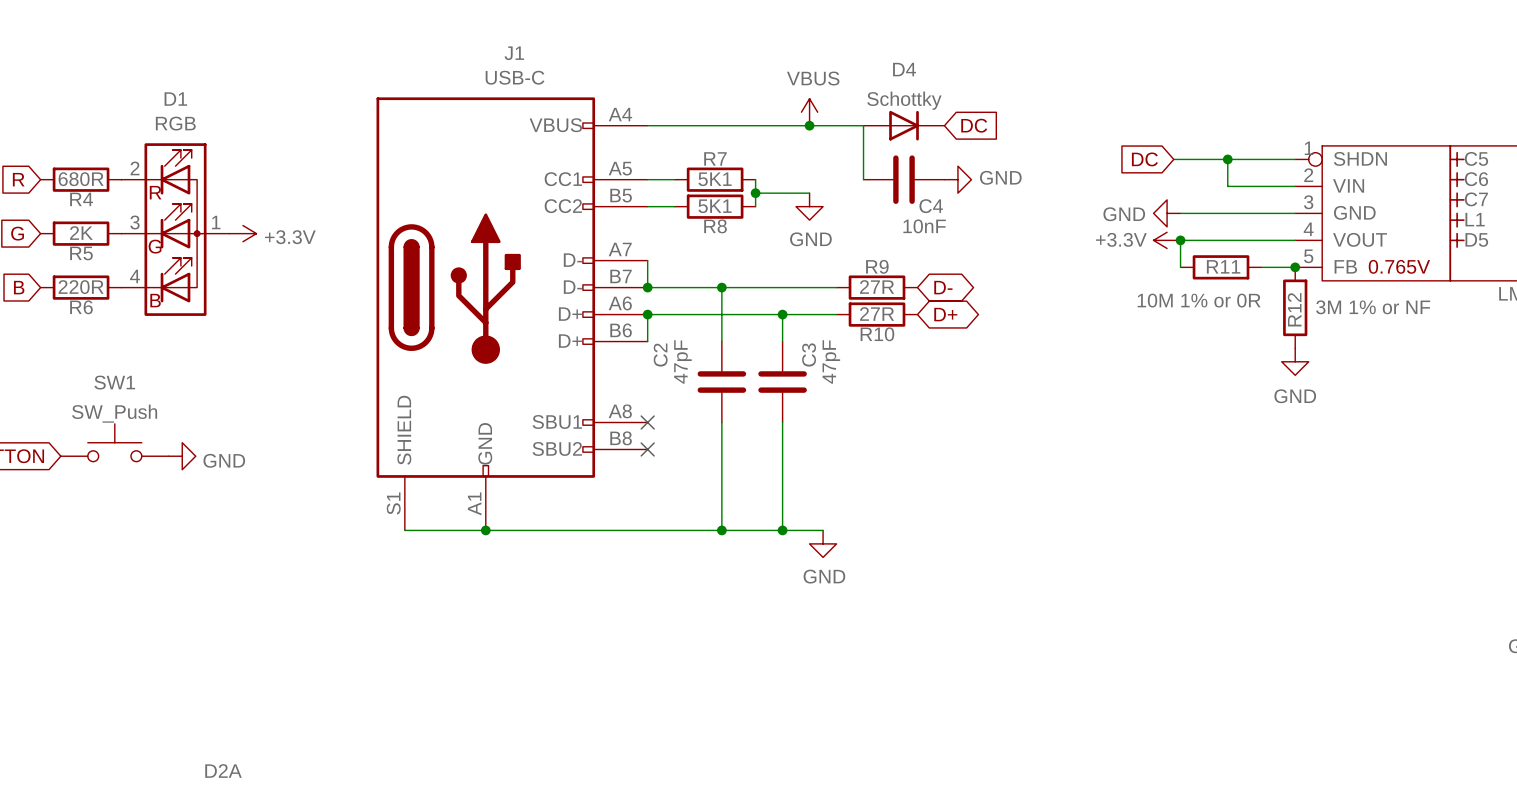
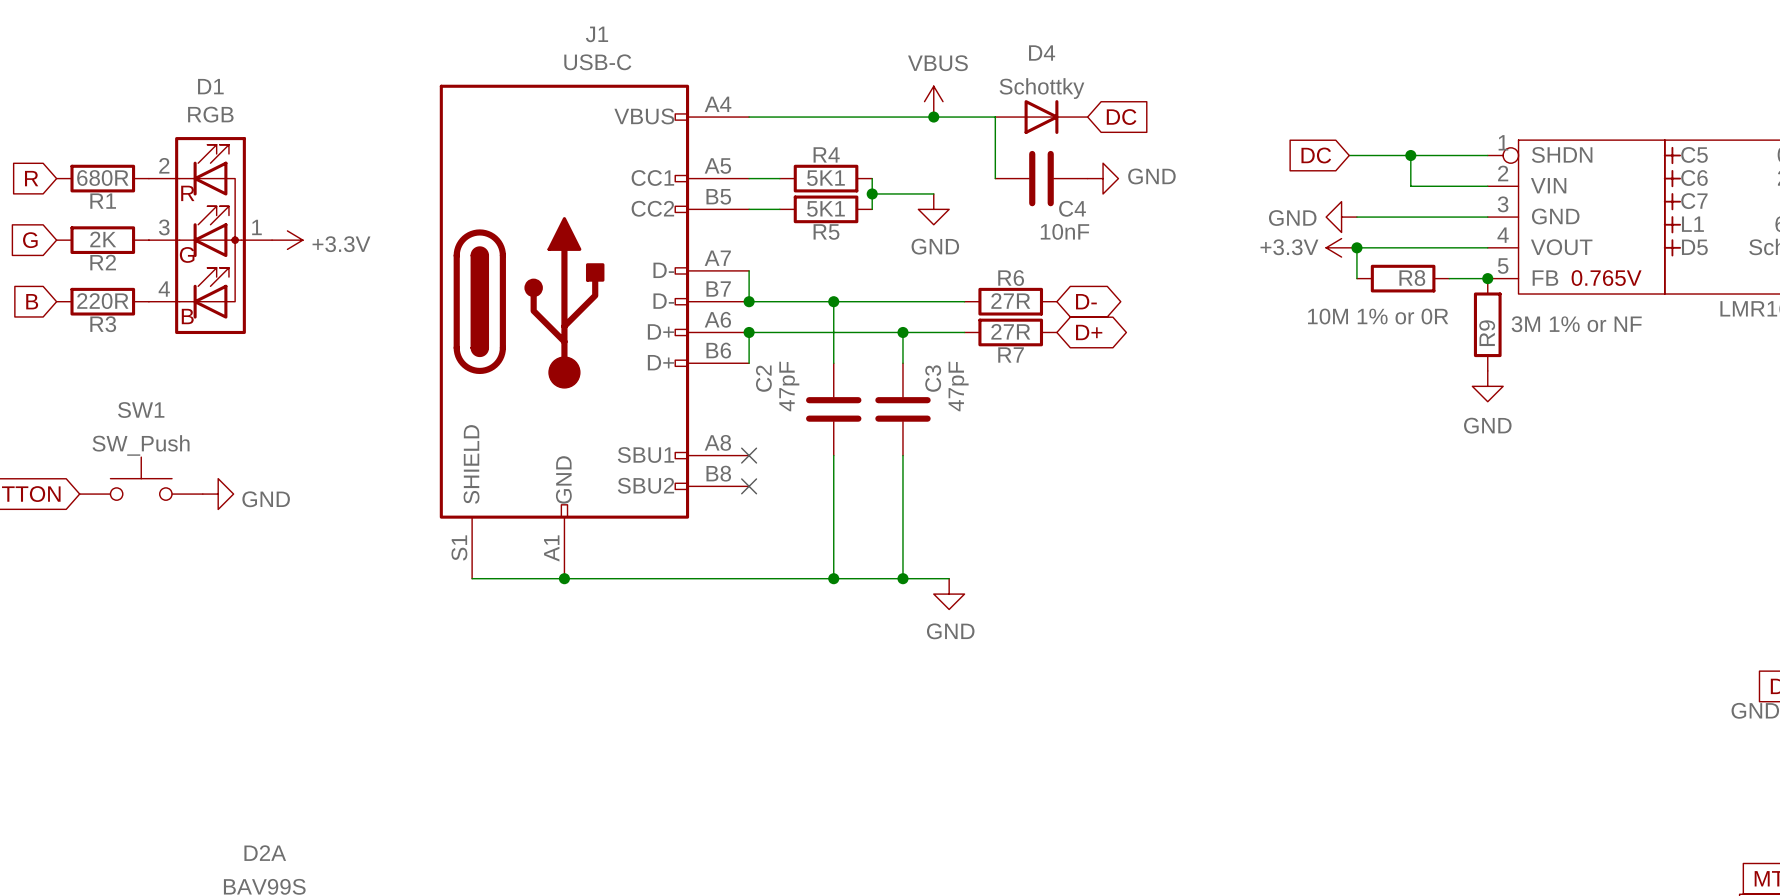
R7 name: R7 (715, 158) -> R4 (826, 154)
R4 name: R4 (81, 199) -> R1 (103, 201)
R8 name: R8 (715, 226) -> R5 (826, 231)
R5 name: R5 (81, 253) -> R2 (103, 262)
R9 name: R9 (877, 266) -> R6 (1011, 278)
R11 name: R11 (1223, 266) -> R8 (1412, 278)
R6 name: R6 (81, 307) -> R3 (103, 324)
R12 name: R12 (1294, 309) -> R9 (1487, 333)
R10 name: R10 (877, 334) -> R7 (1011, 354)

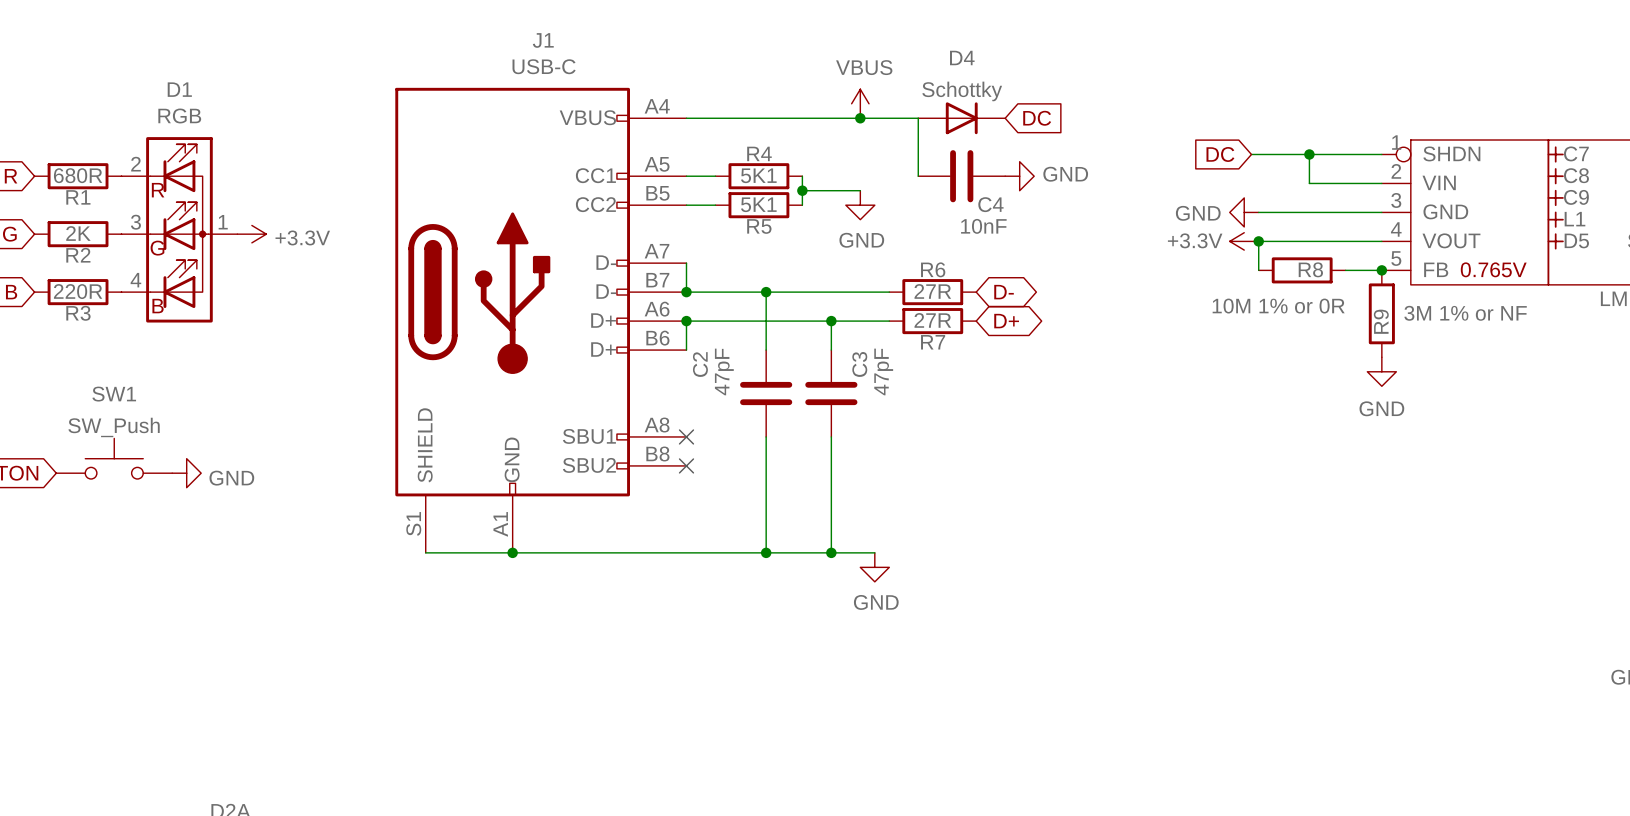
C5 name: C5 (1694, 154) -> C7 (1576, 153)
C6 name: C6 (1694, 178) -> C8 (1576, 175)
C7 name: C7 (1694, 201) -> C9 (1576, 197)

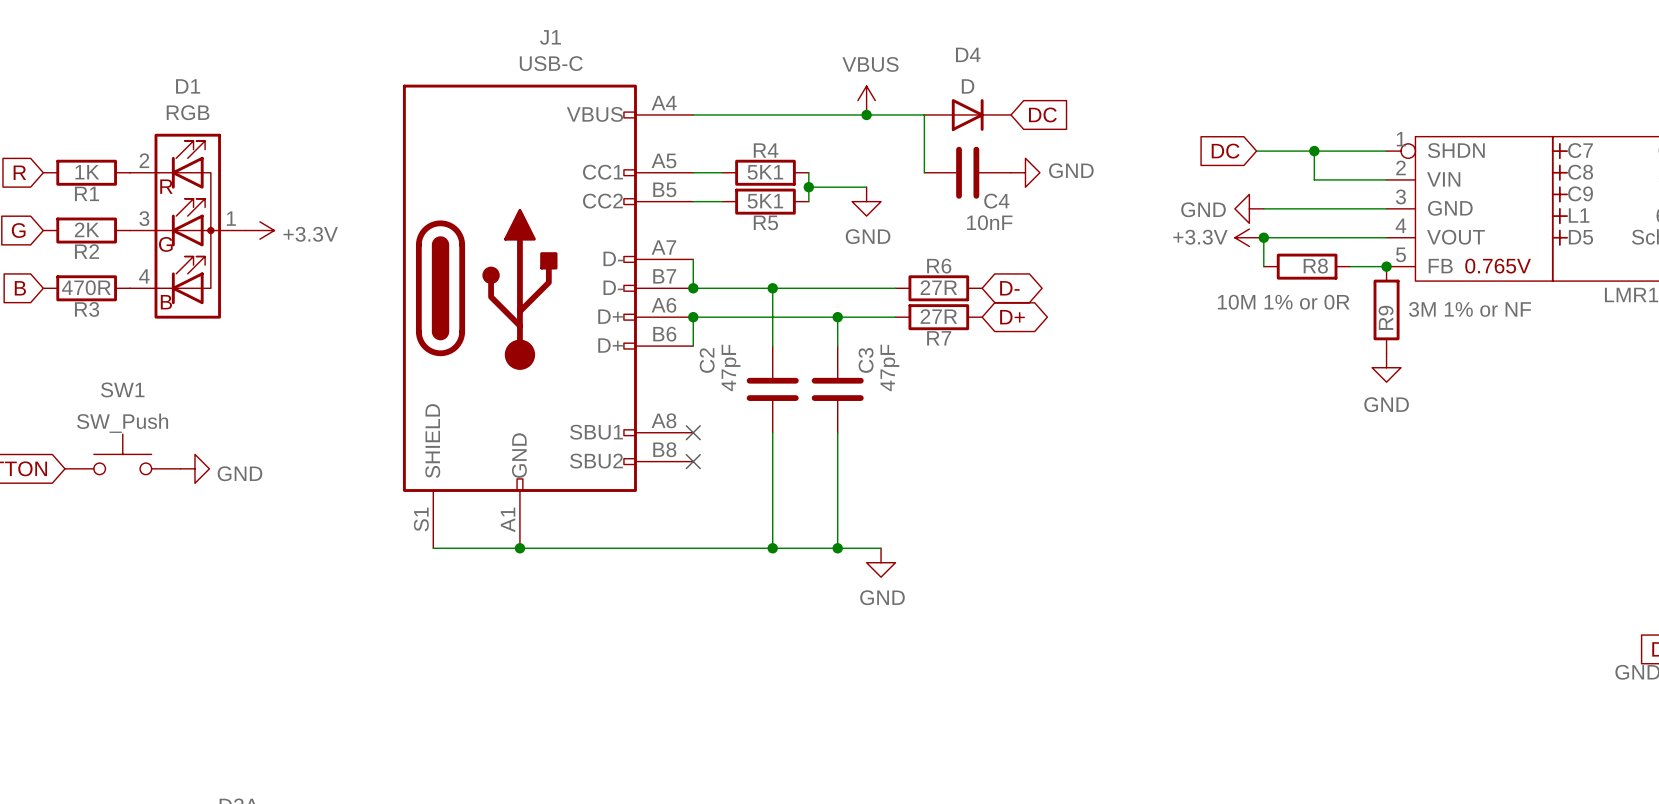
D4 value: Schottky (962, 91) -> D (968, 86)
R1 value: 680R (78, 175) -> 1K (87, 172)
R3 value: 220R (78, 291) -> 470R (86, 287)

